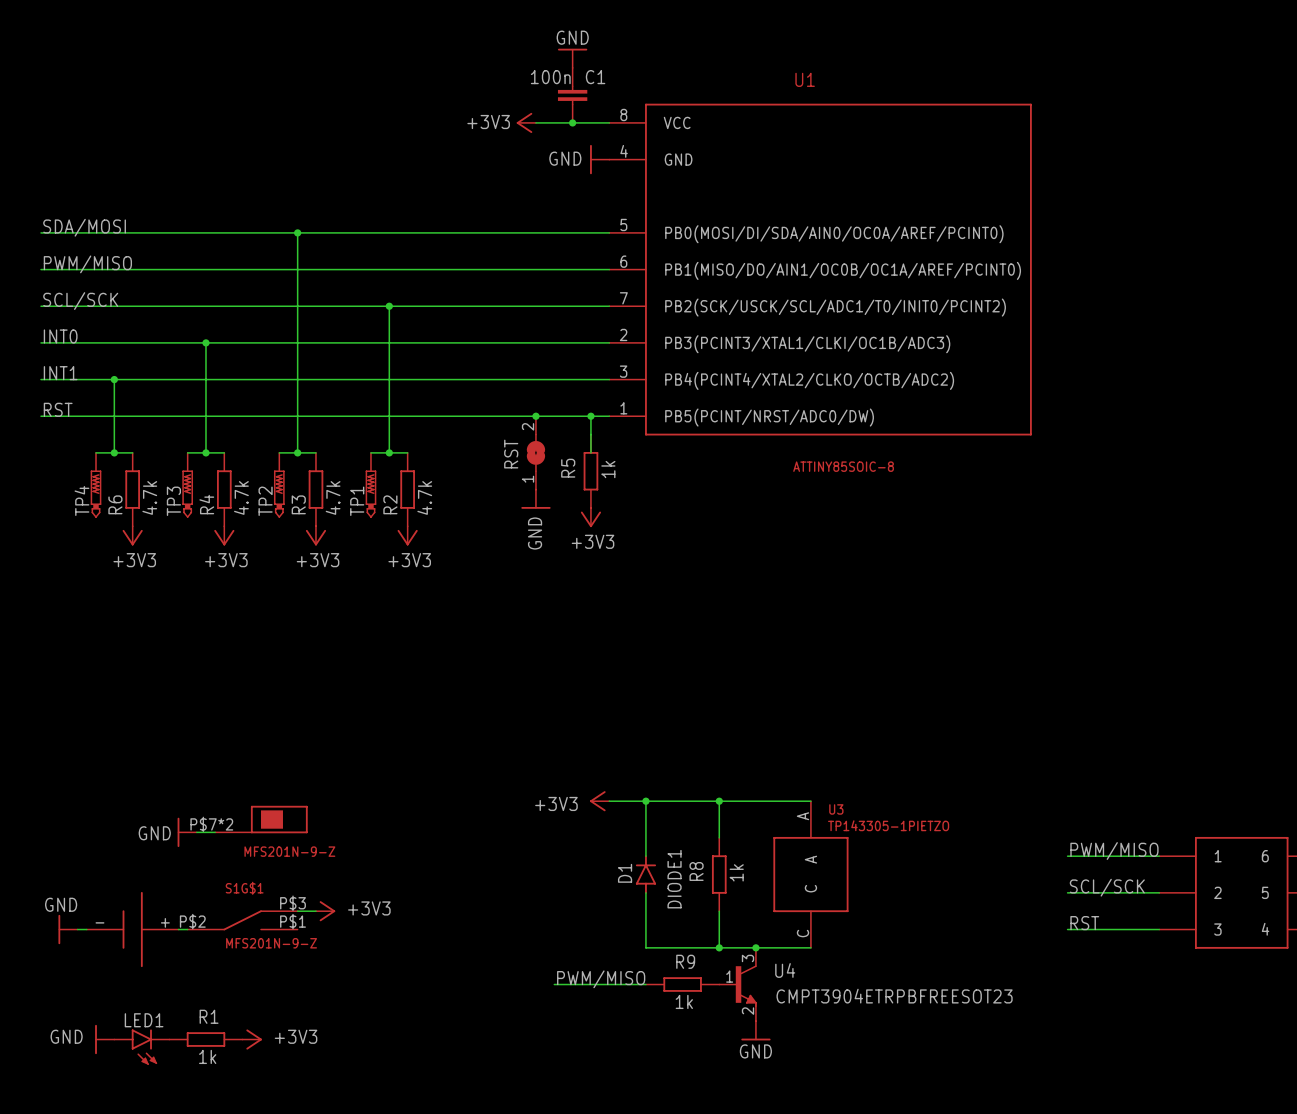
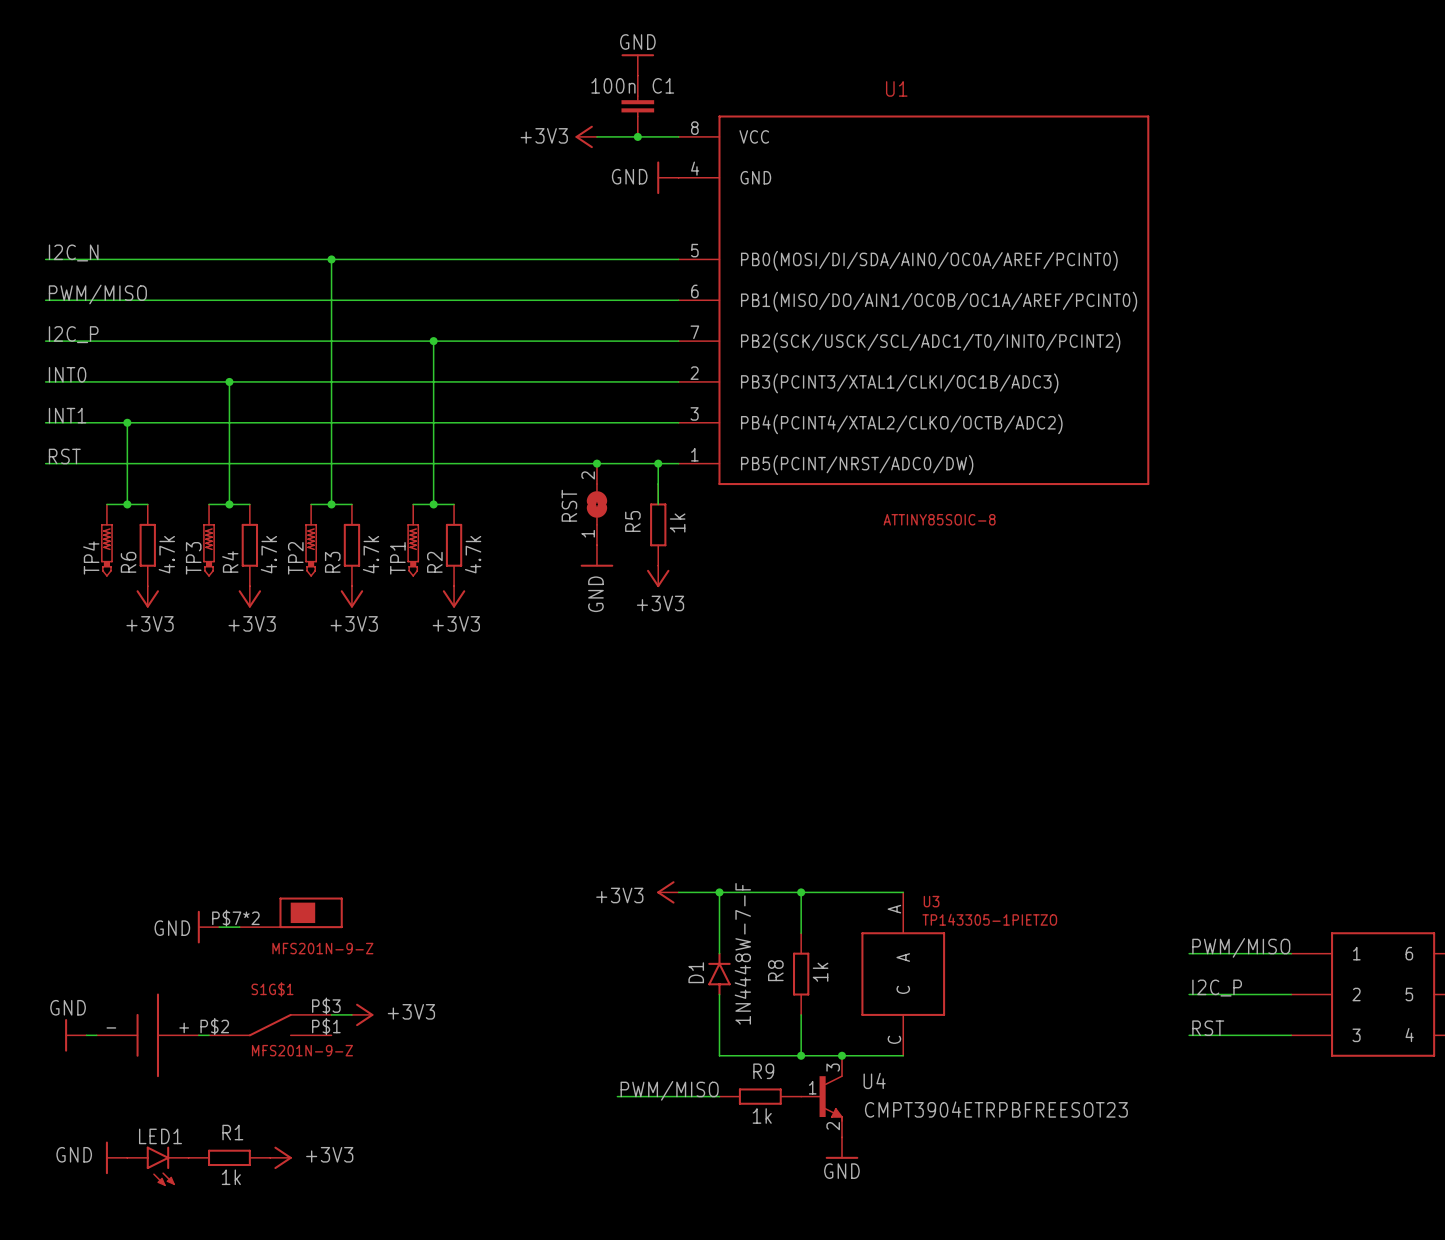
label: SDA/MOSI (84, 227) -> I2C_N (73, 252)
label: SCL/SCK (80, 301) -> I2C_P (73, 334)
D1 value: DIODE1 (674, 879) -> 1N4448W-7-F (742, 953)
label: SCL/SCK (1107, 887) -> I2C_P (1217, 988)

